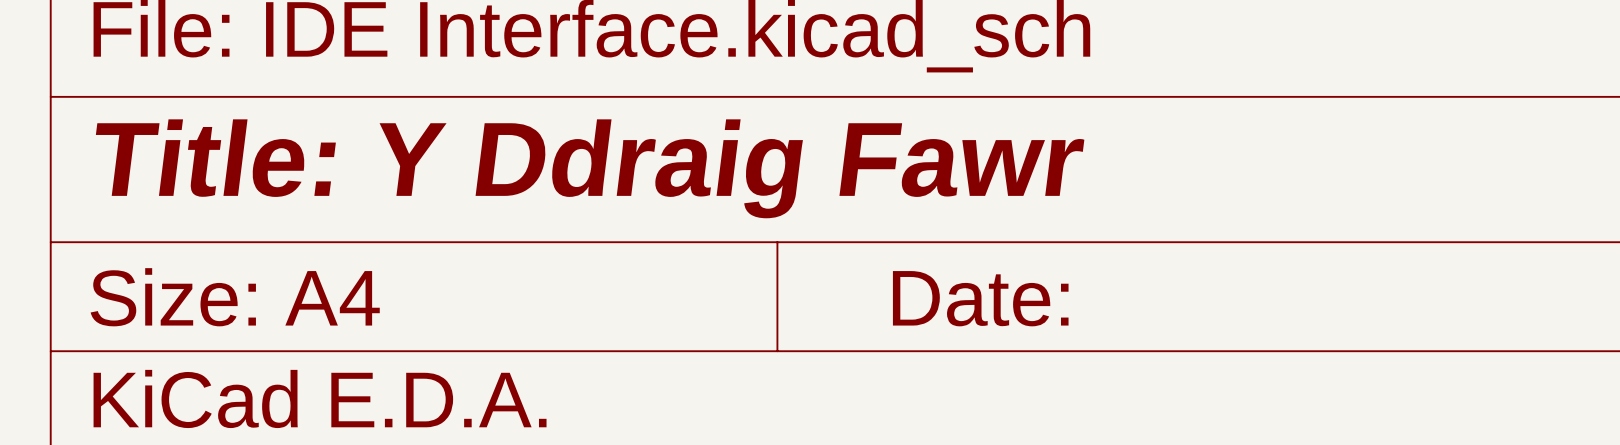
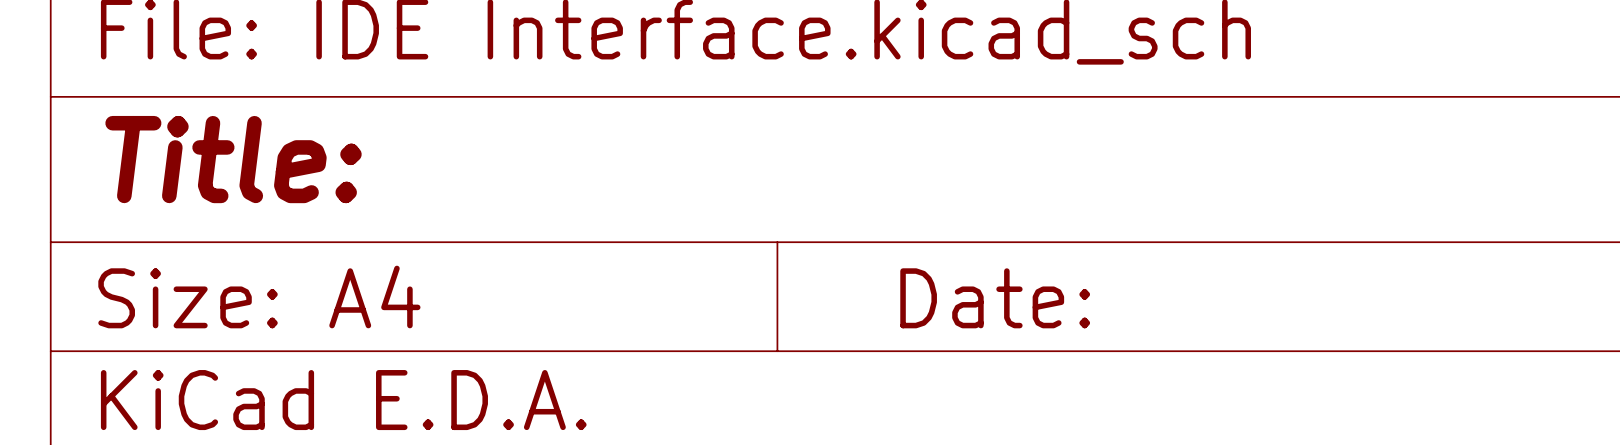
title block: Title: Y Ddraig Fawr (590, 168) -> Title: (233, 159)

